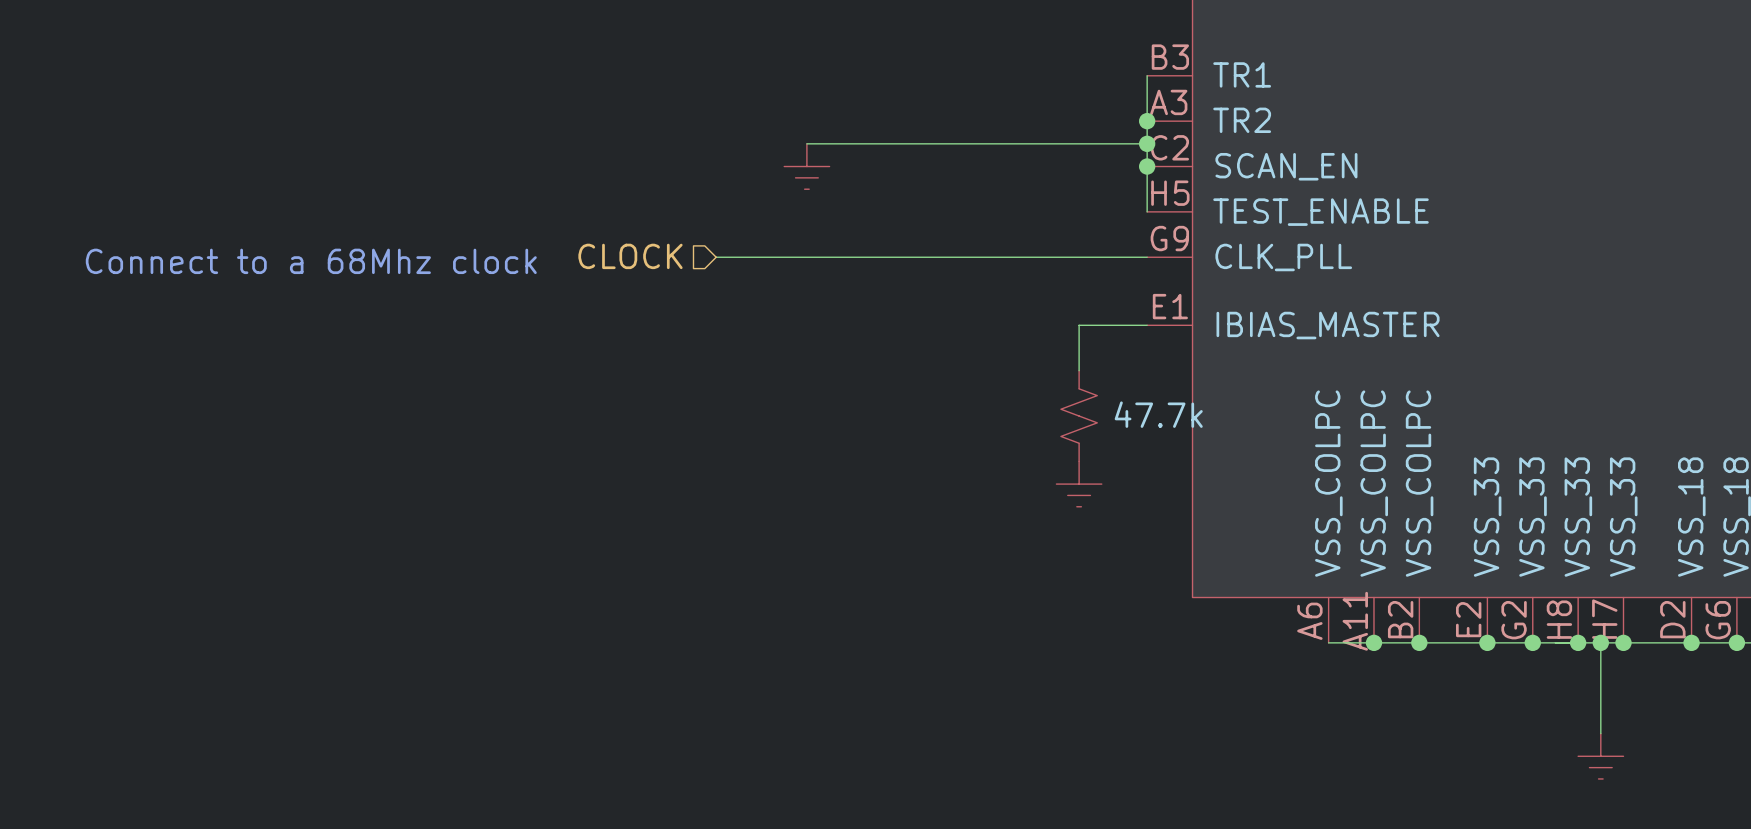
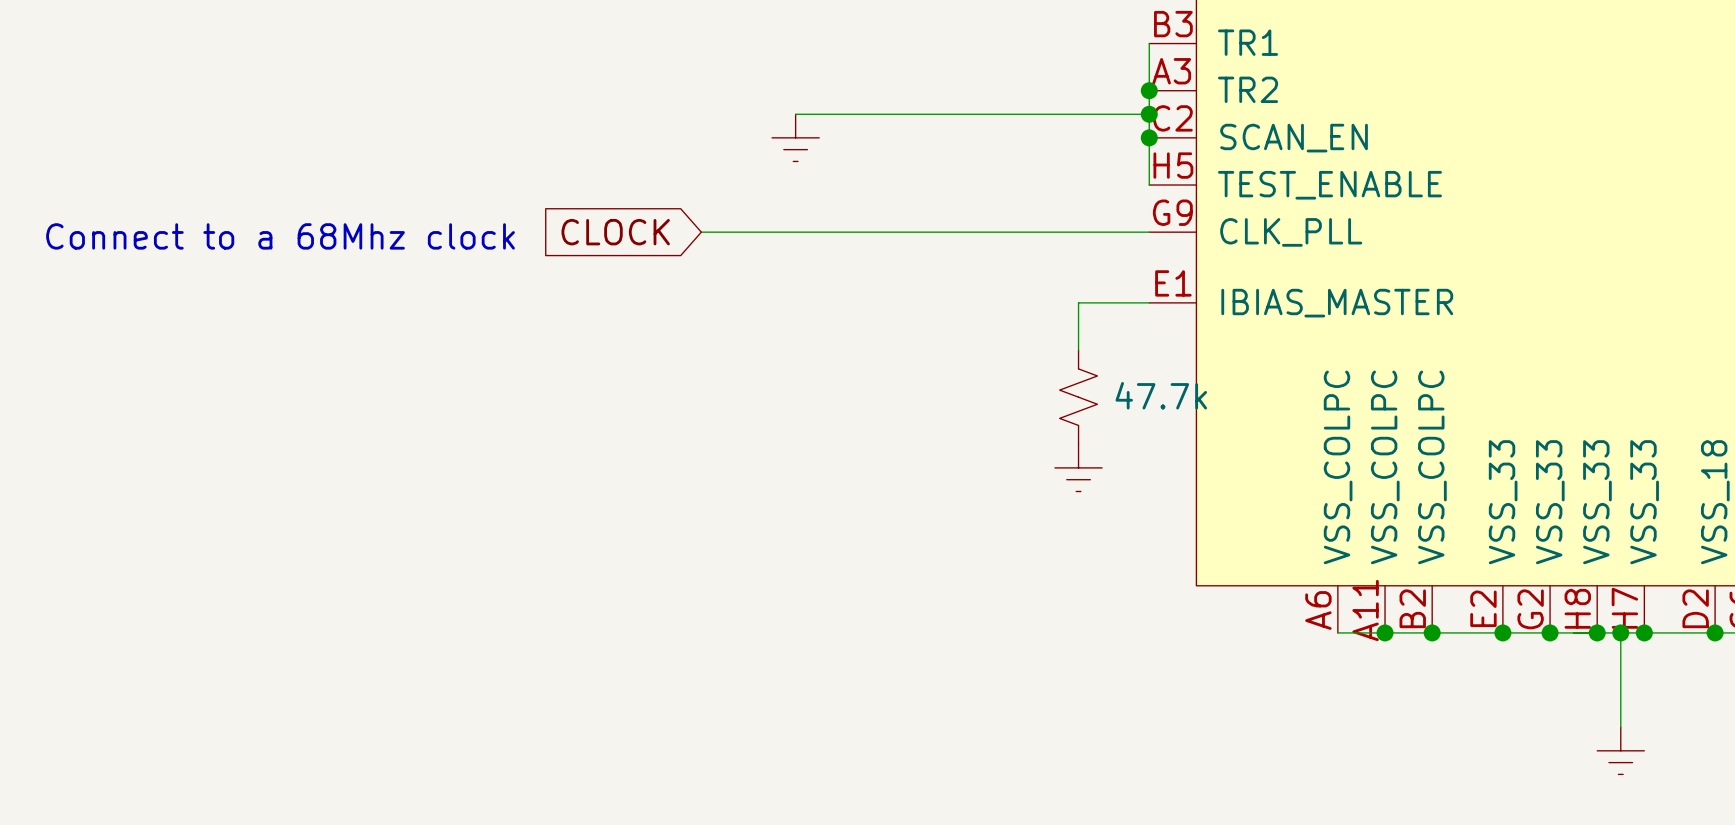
hierarchical label: CLOCK (630, 256) -> none
global label: none -> CLOCK (615, 232)

